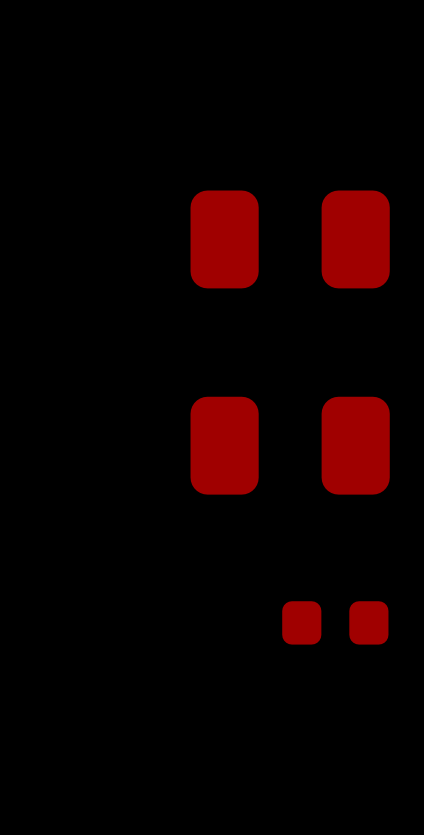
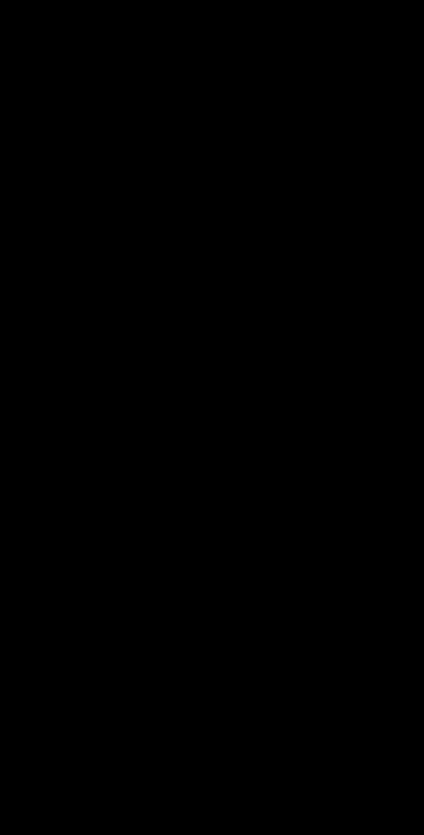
part: (290, 239) -> none
part: (290, 445) -> none
part: (335, 622) -> none

